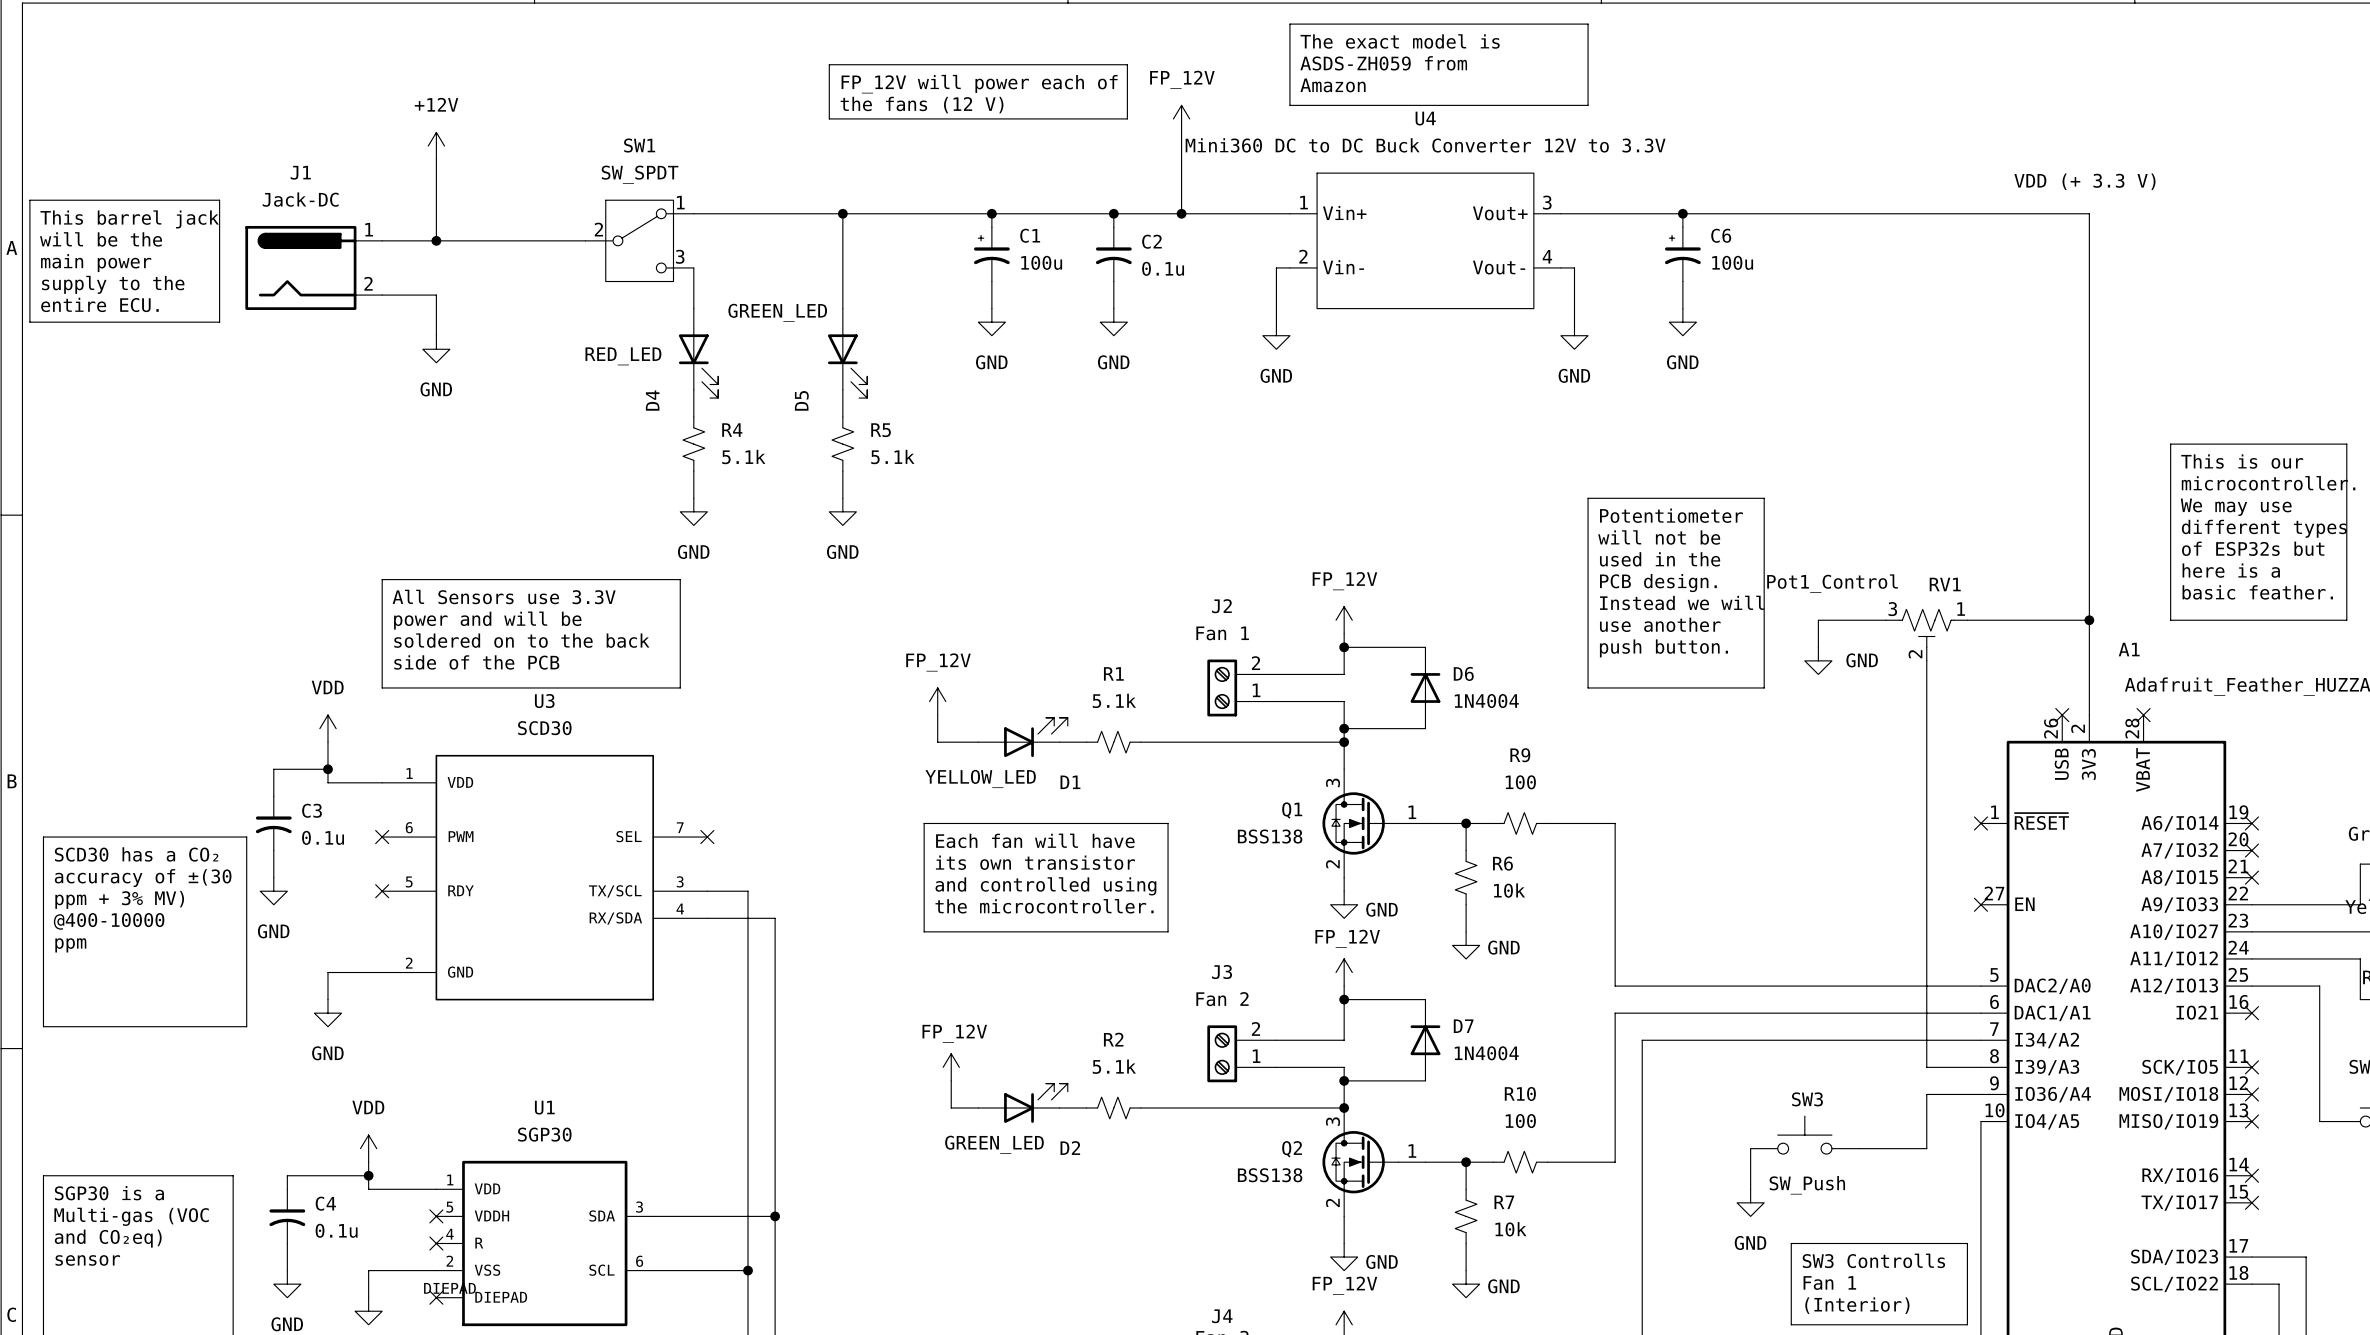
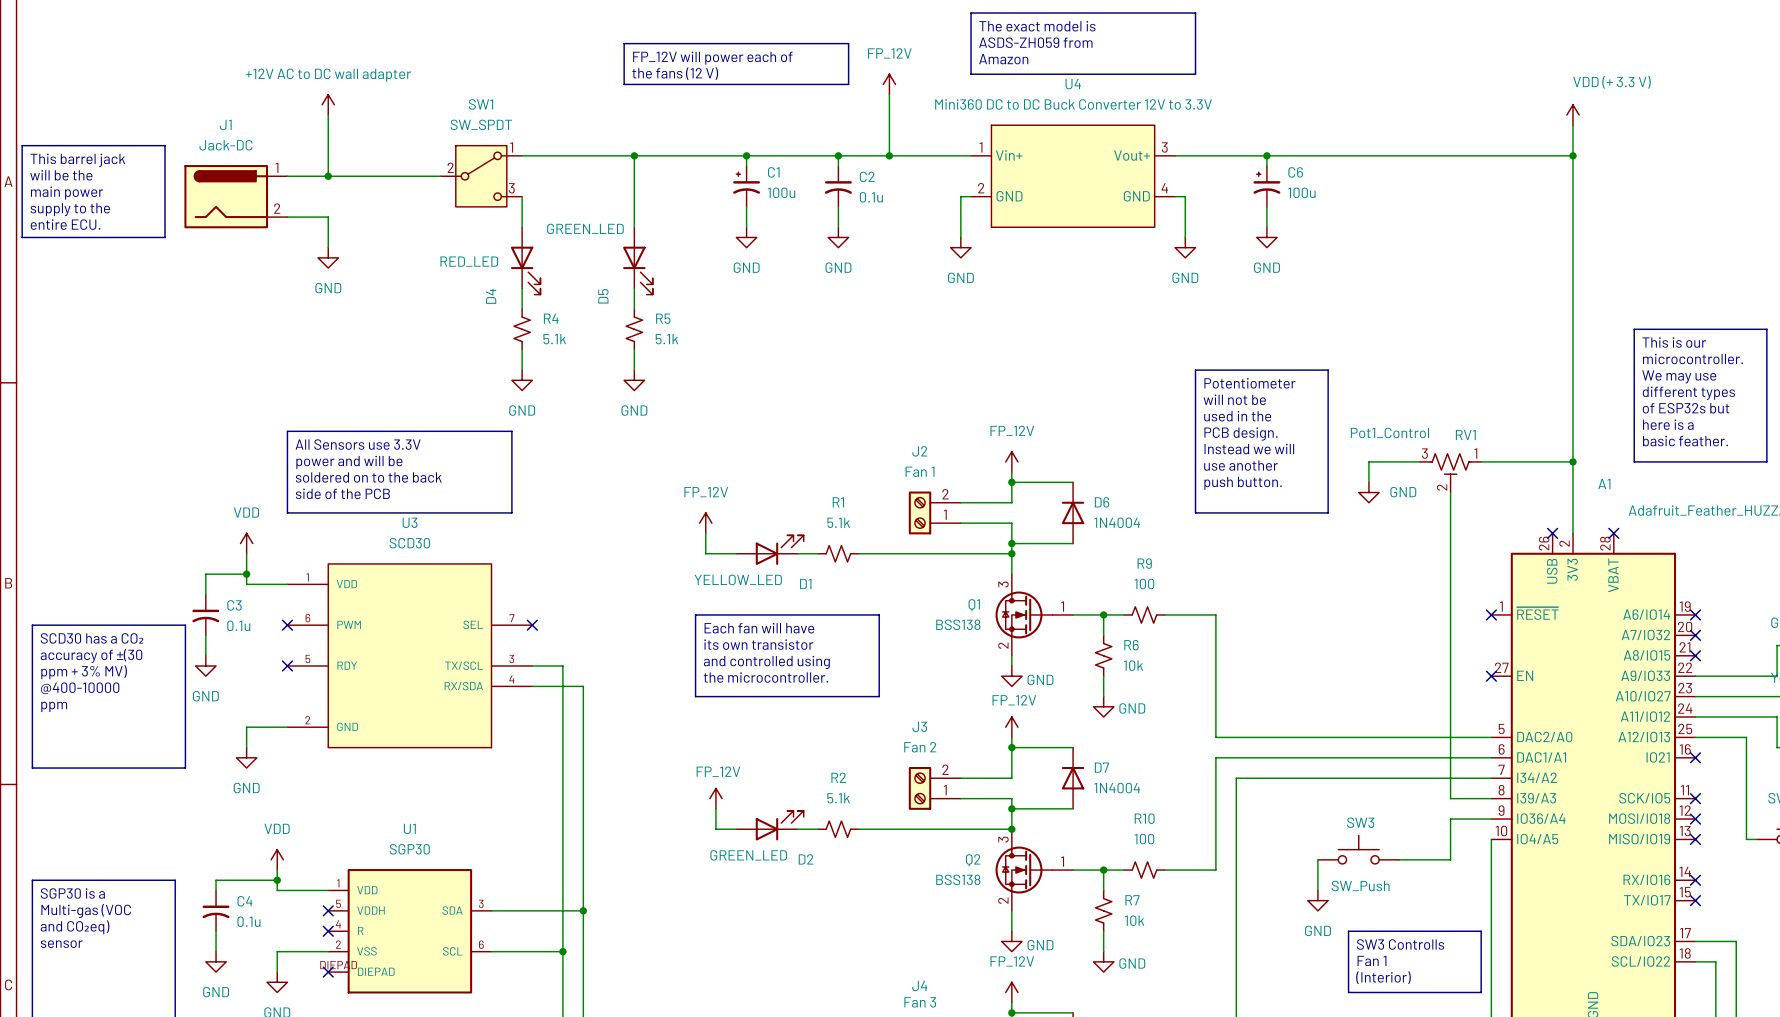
power symbol: +12V (436, 146) -> +12V AC to DC wall adapter (328, 104)
power symbol: none -> VDD (+ 3.3 V) (1573, 115)
wire: none -> (1573, 125) (1573, 155)
text: VDD (+ 3.3 V) (2084, 181) -> none
junction: none -> (1573, 155)
U4 pin name: Vin- (1343, 267) -> GND (1009, 196)
U4 pin name: Vout- (1499, 267) -> GND (1136, 196)

